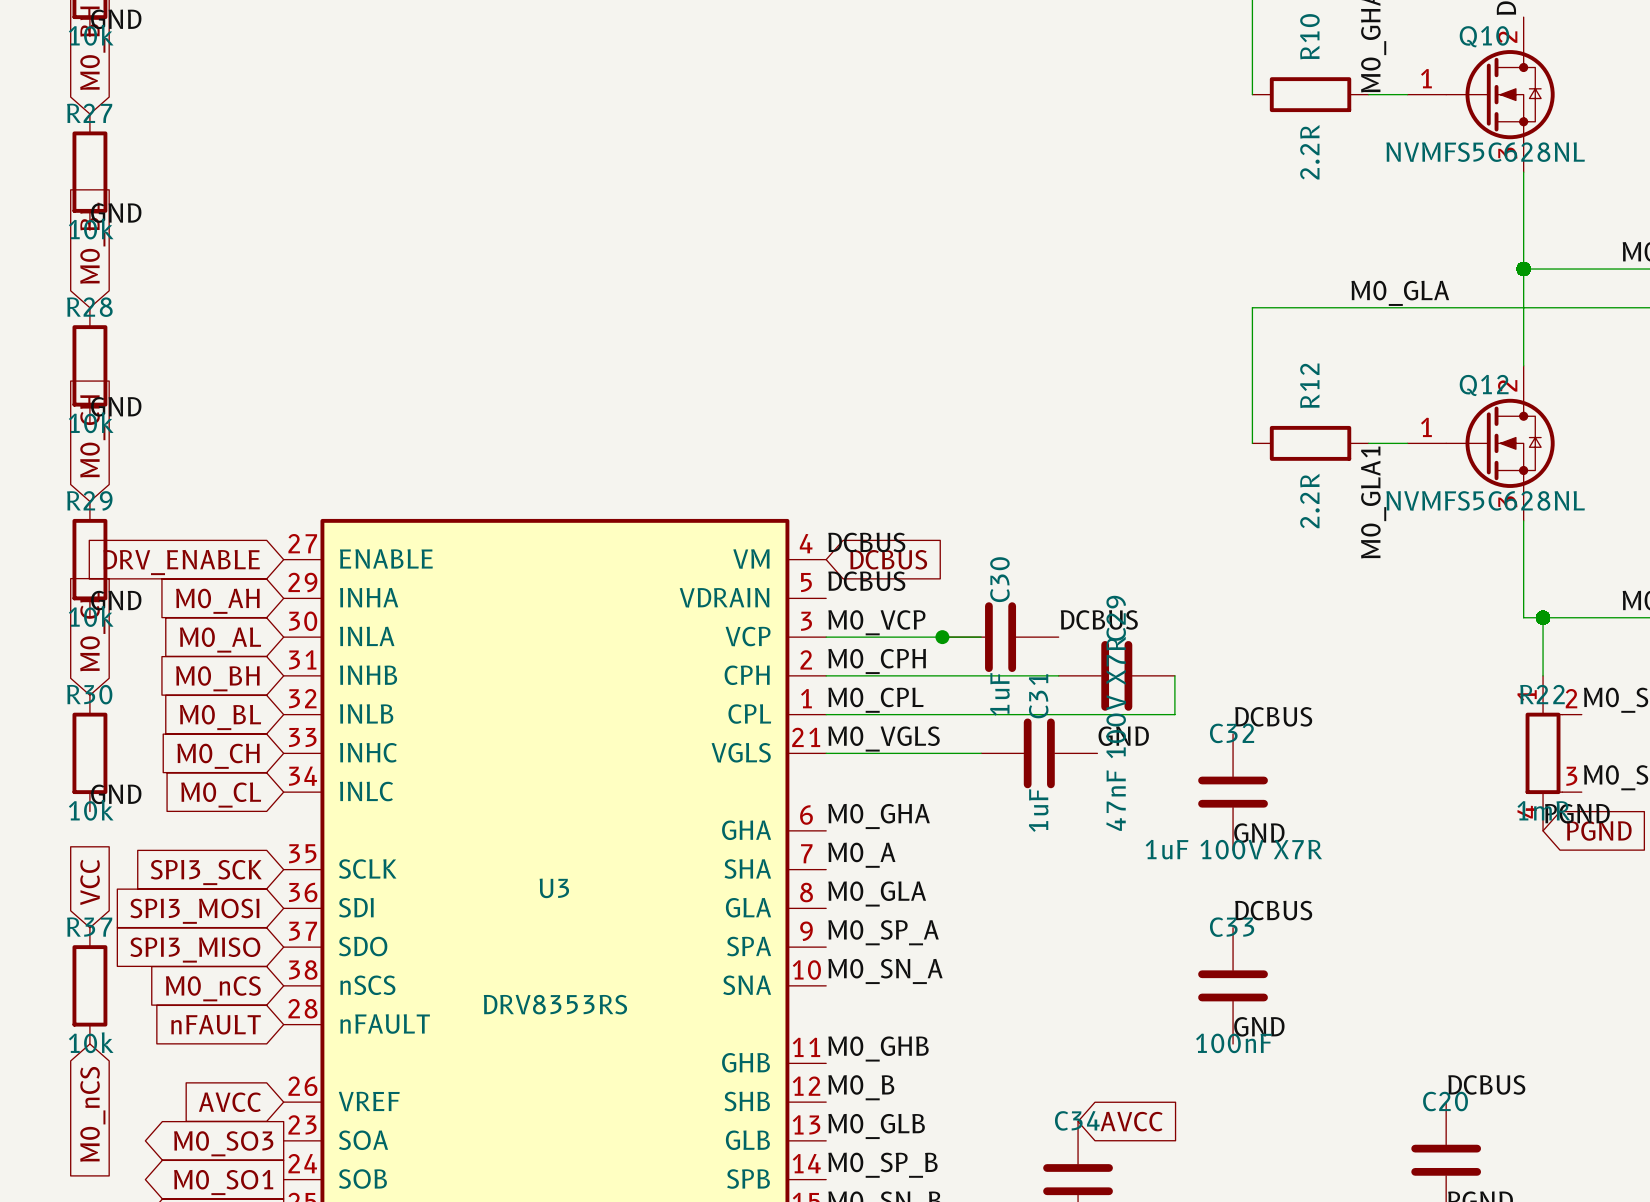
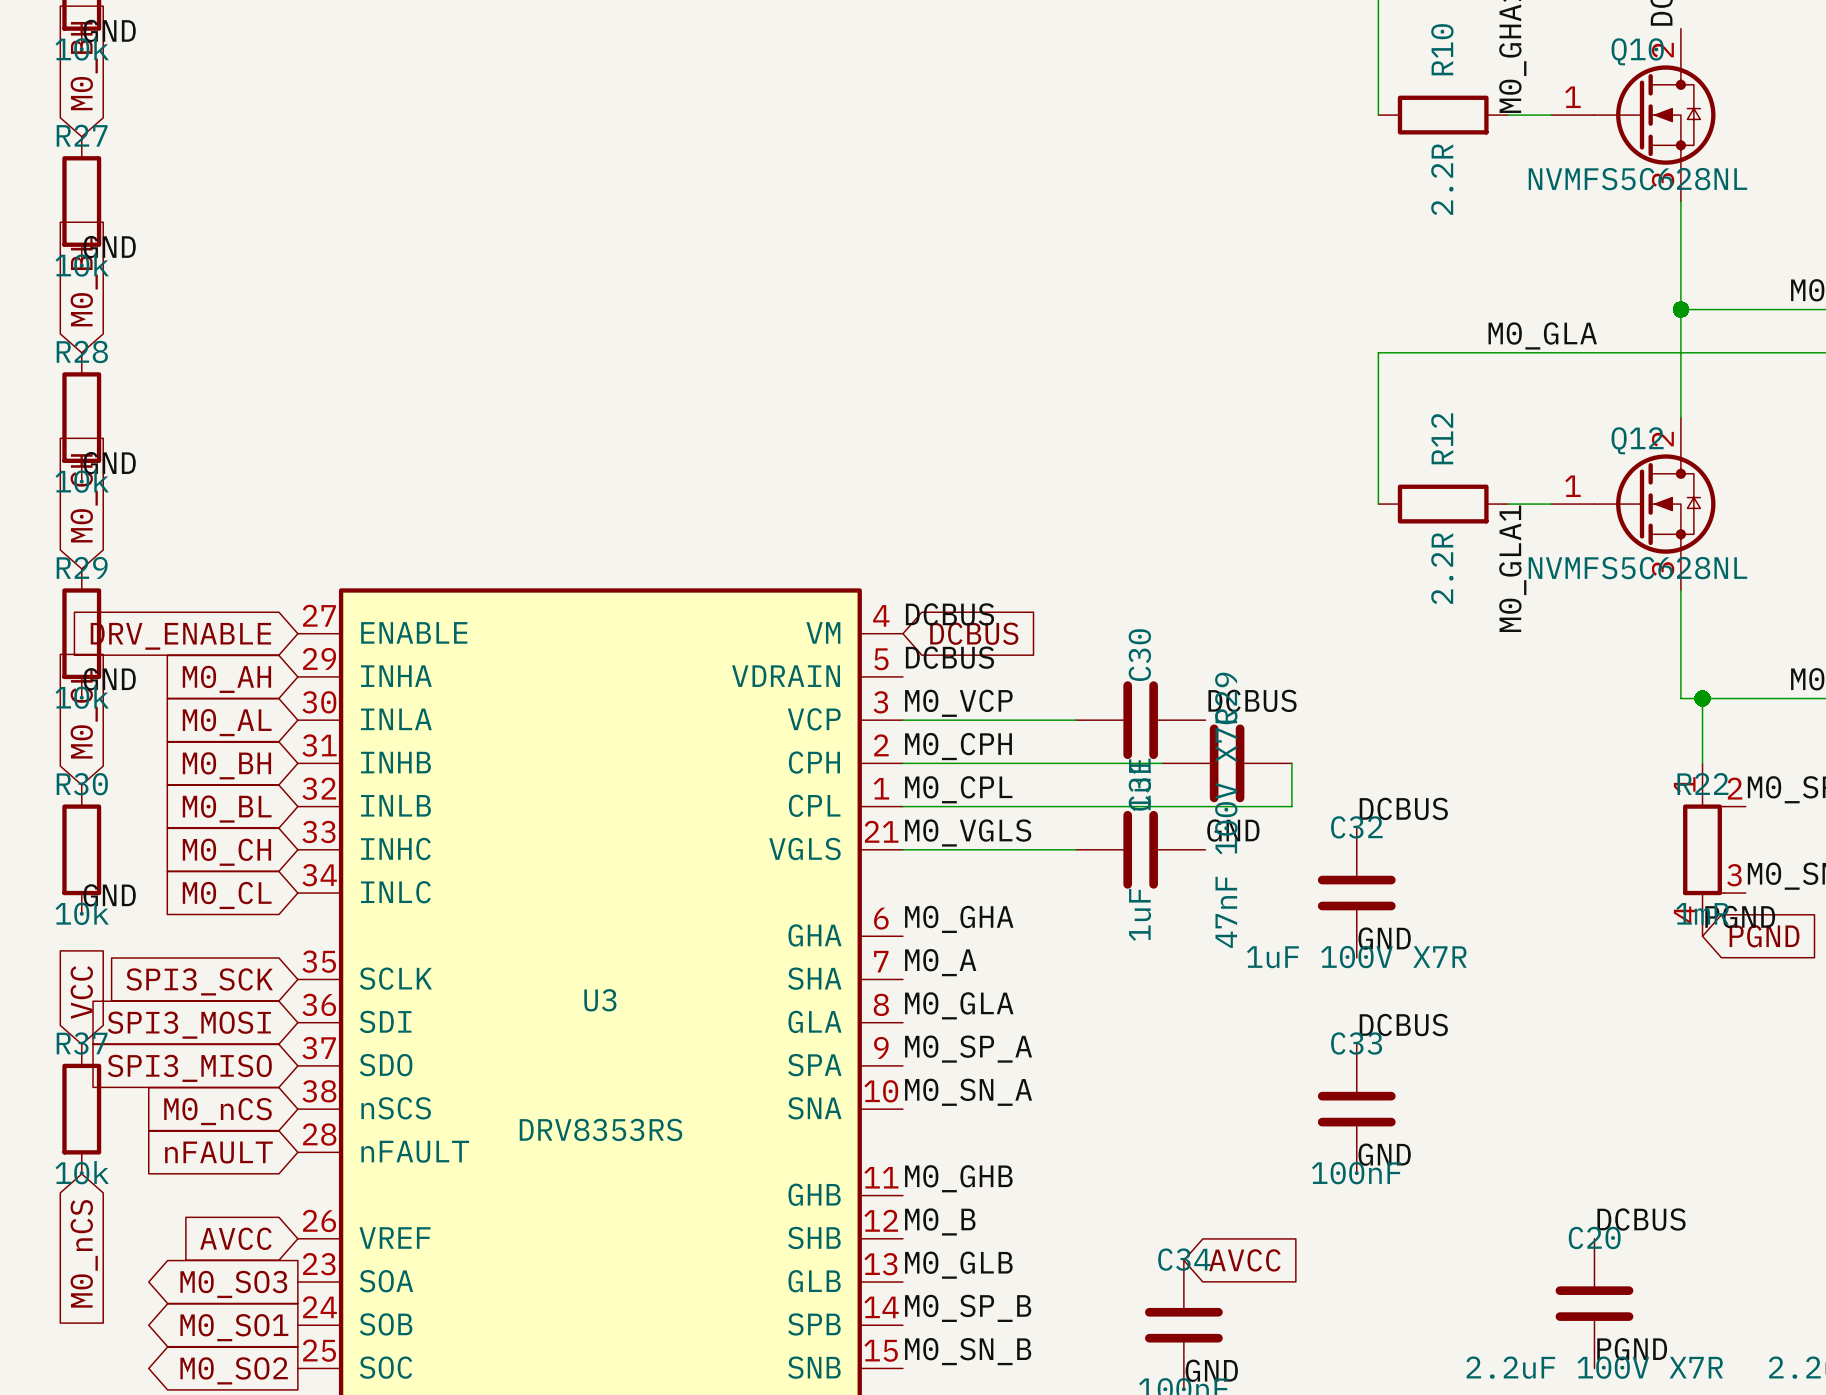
label position: DCBUS (1099, 619) -> DCBUS (1252, 700)
junction: (942, 637) -> none
C30 position: (1000, 637) -> (1140, 720)

